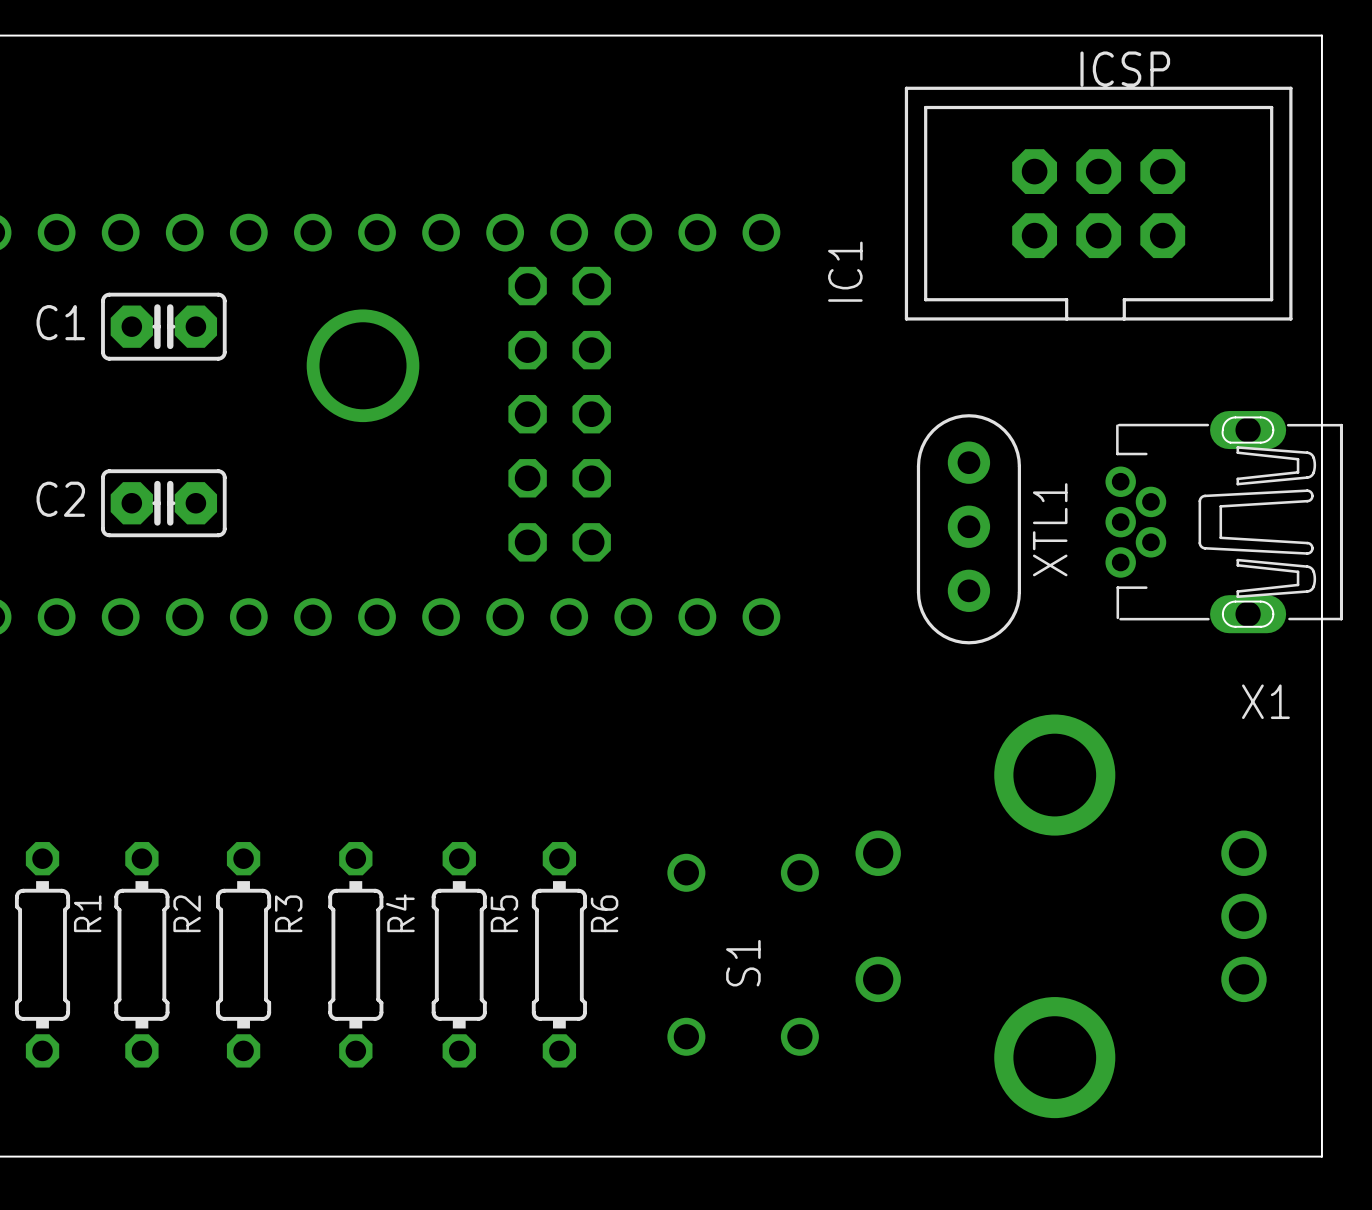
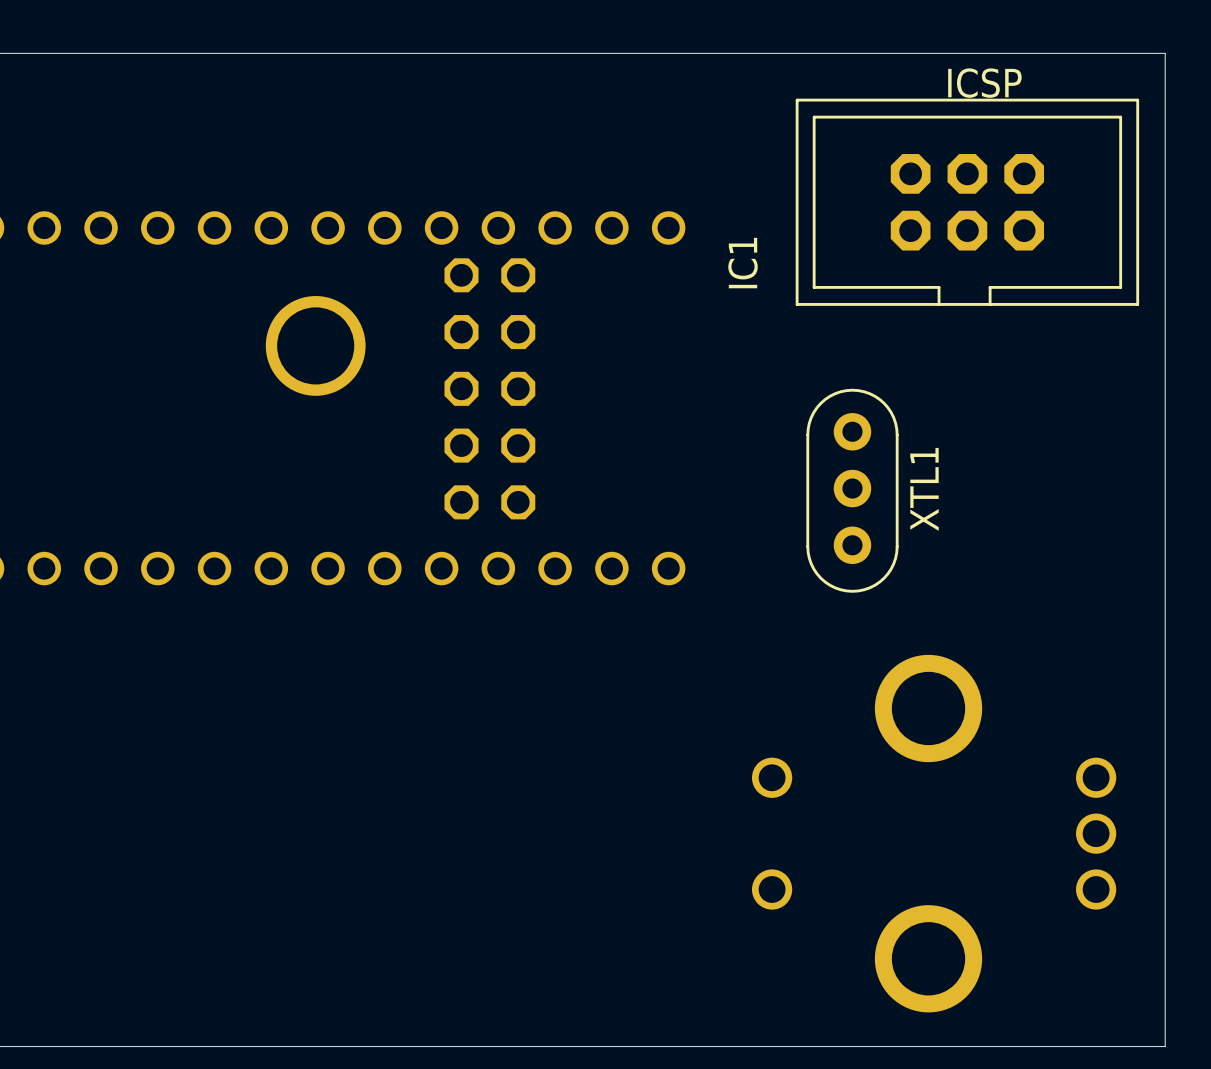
C1: (163, 326) -> none
C2: (163, 503) -> none
X1: (1224, 522) -> none
R1: (42, 954) -> none
R2: (141, 954) -> none
R3: (243, 954) -> none
R4: (355, 954) -> none
R5: (459, 954) -> none
R6: (559, 954) -> none
S1: (743, 954) -> none

